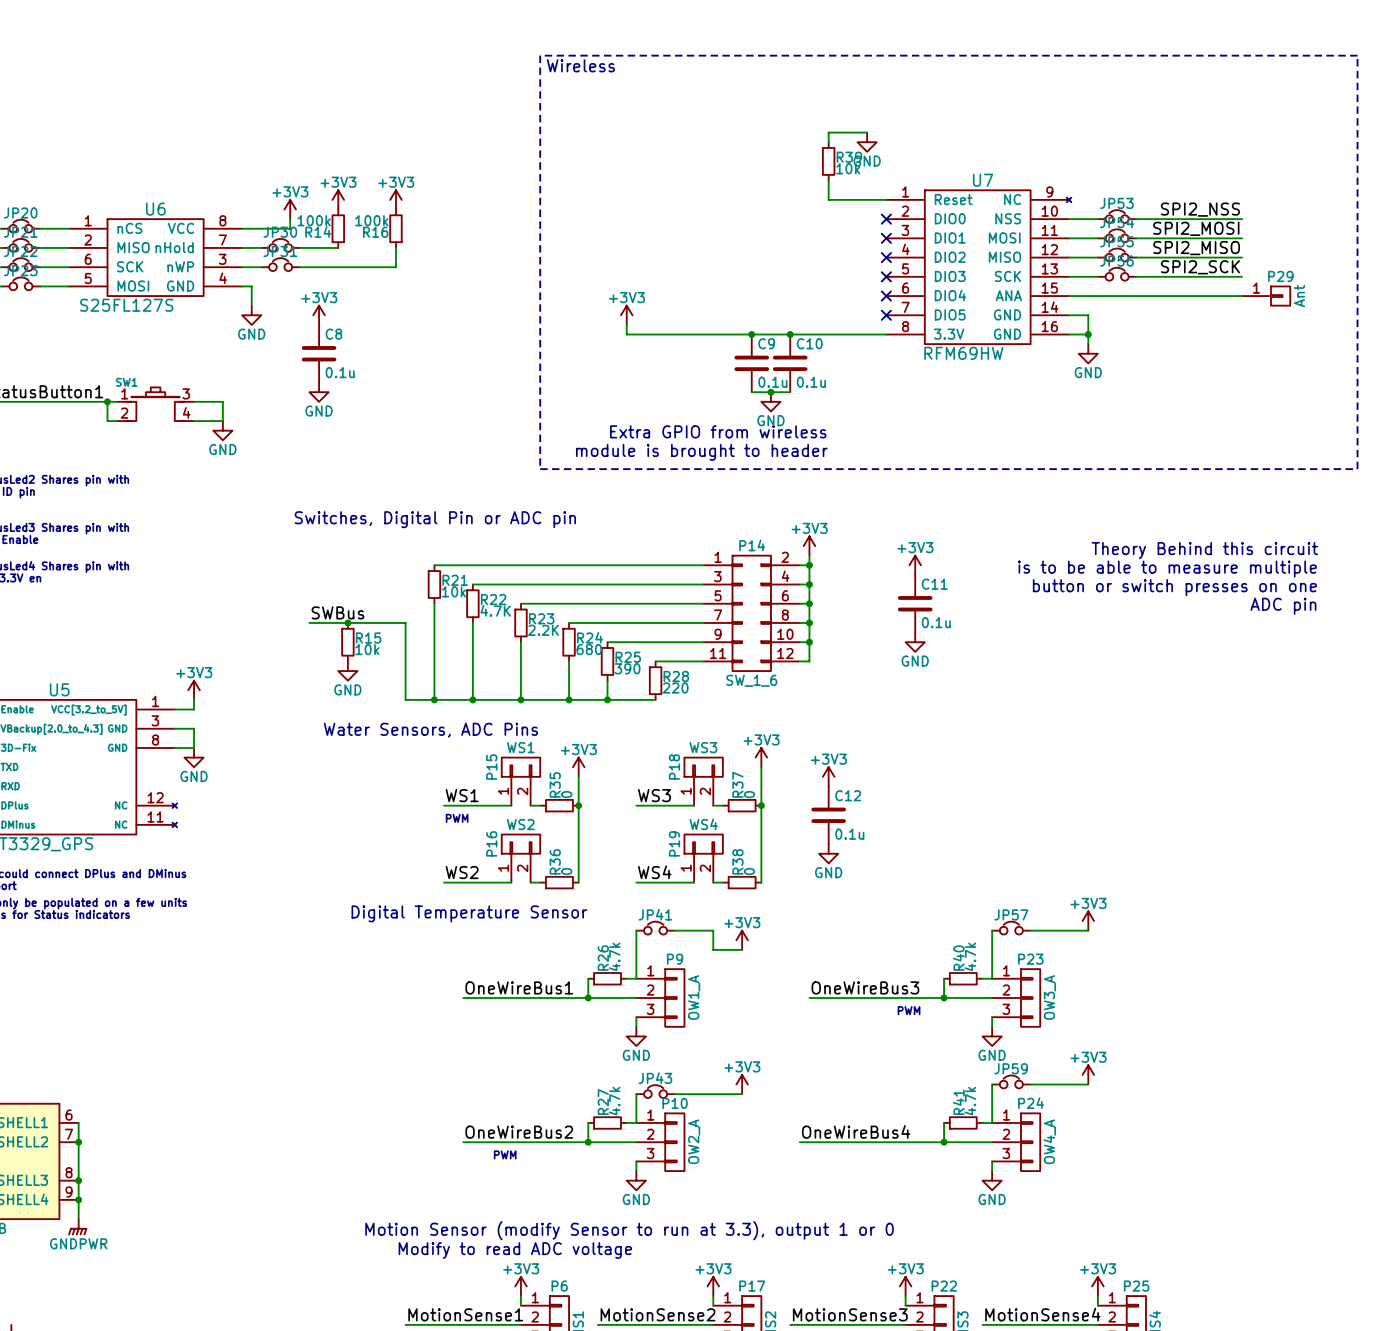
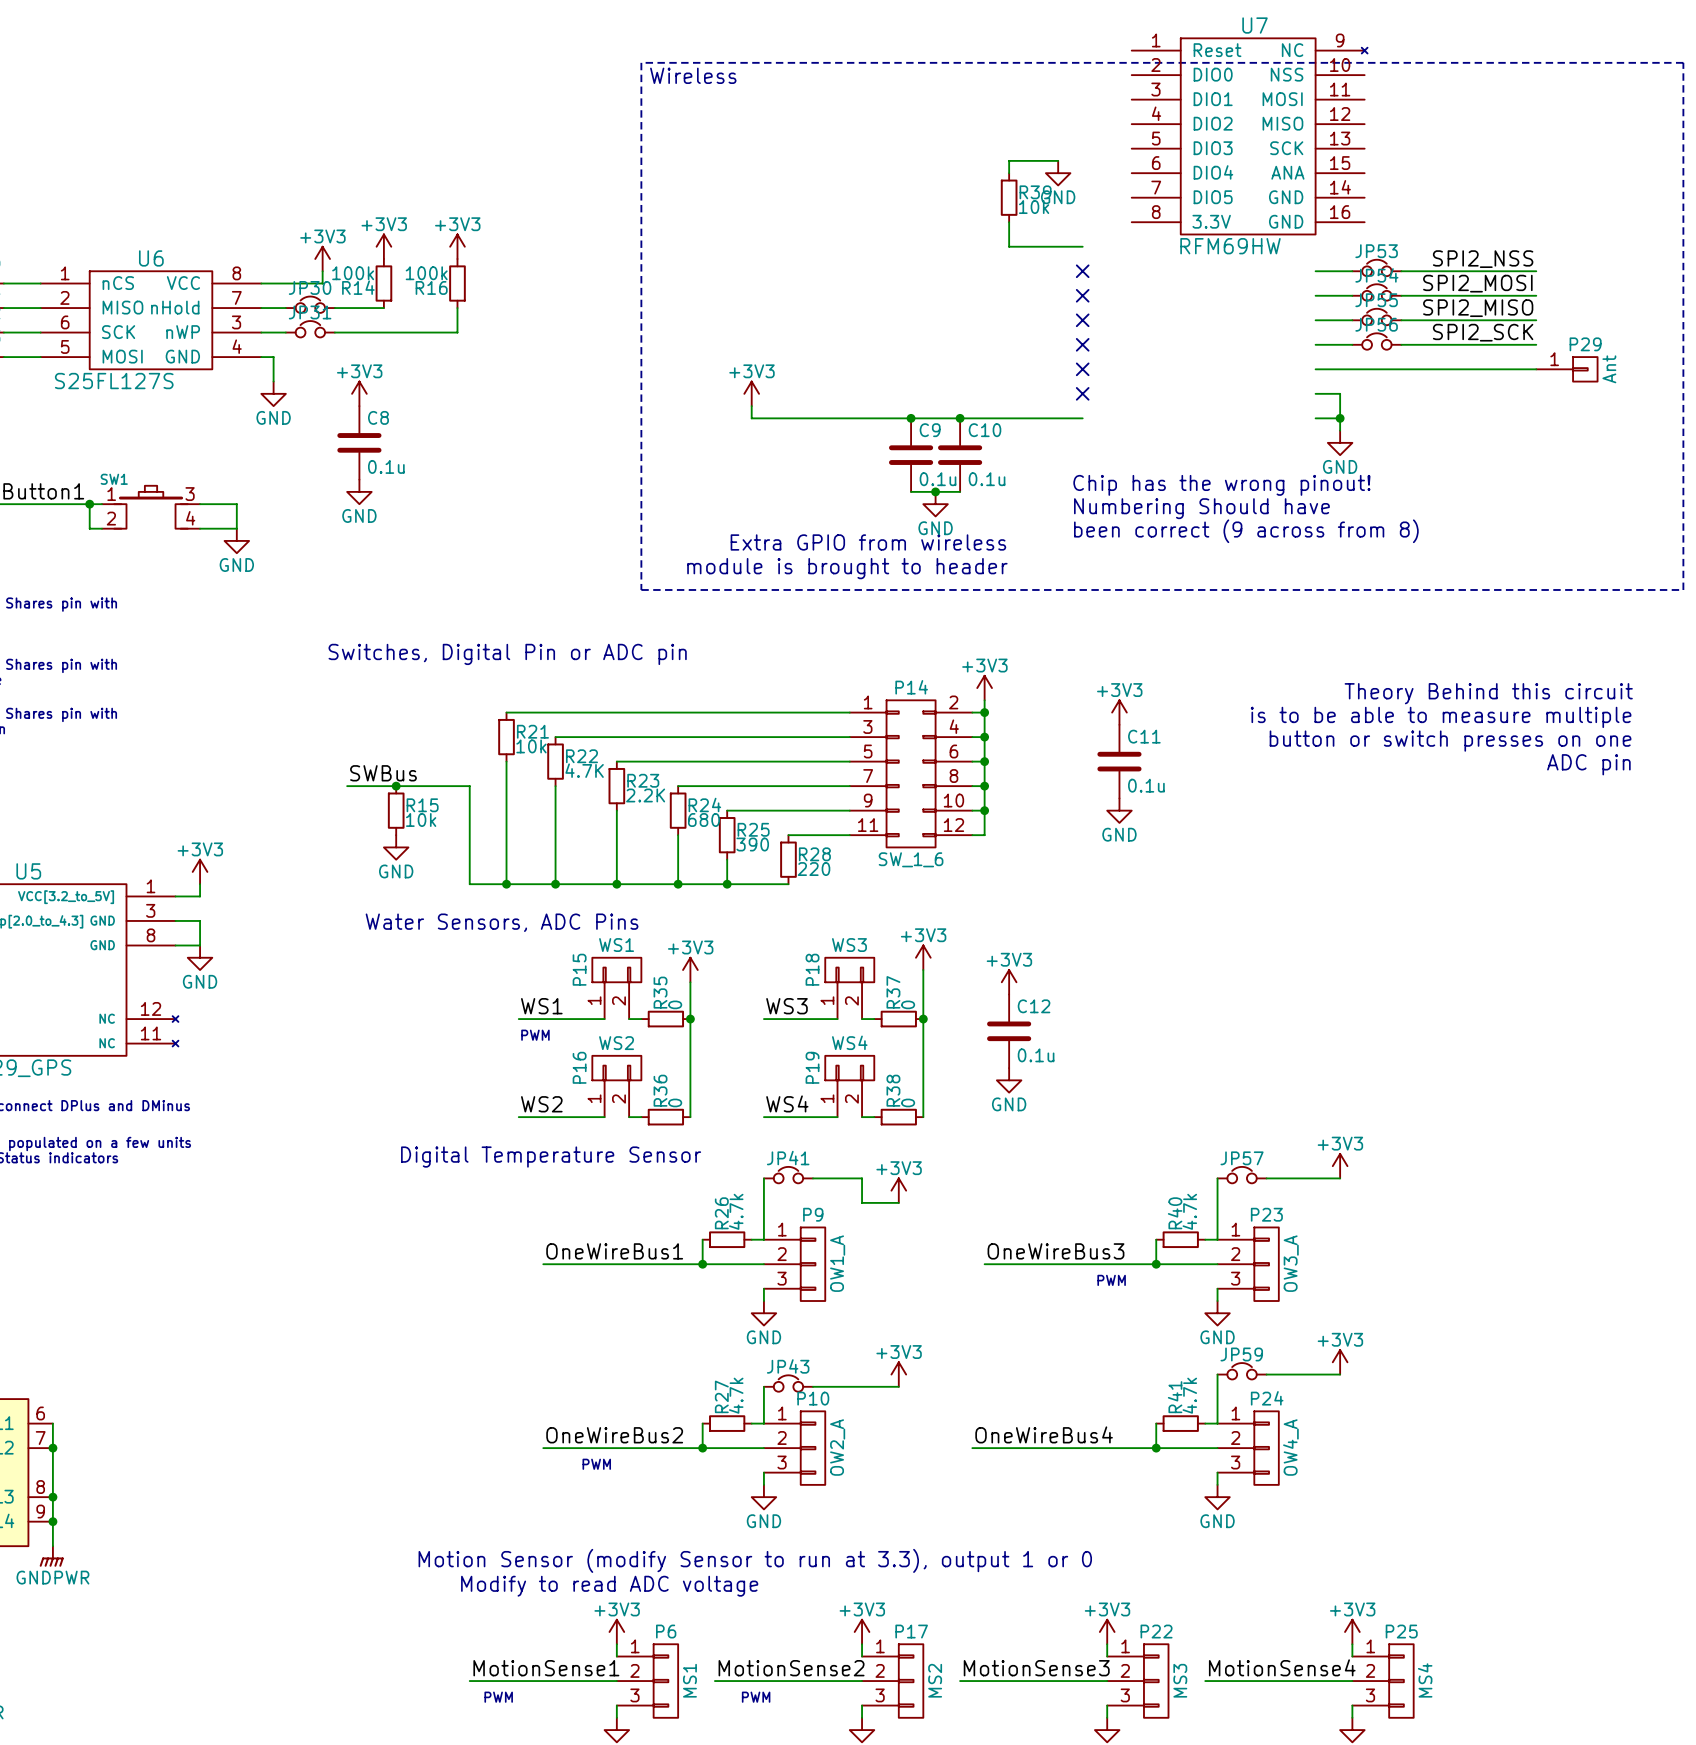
U7 position: (978, 267) -> (1249, 136)
text: none -> Chip has the wrong pinout! (1221, 485)
text: none -> Numbering Should have (1201, 508)
text: none -> been correct (9 across from 8) (1246, 531)

